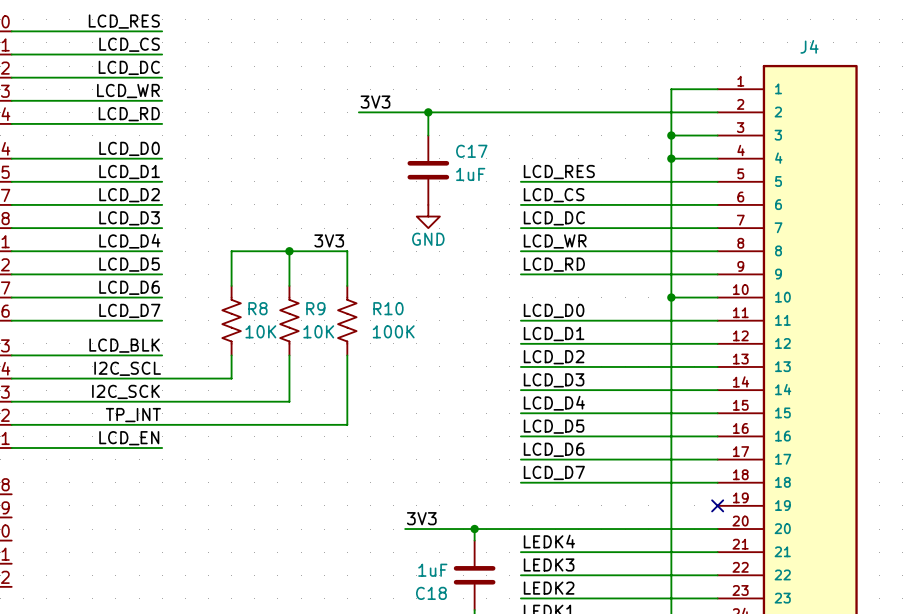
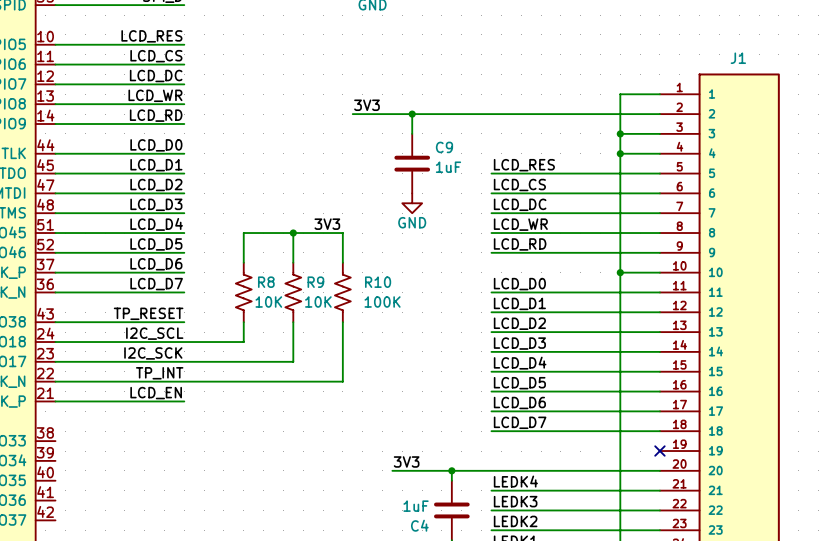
J4 name: J4 (809, 46) -> J1 (738, 58)
C17 name: C17 (471, 151) -> C9 (444, 147)
label: LCD_BLK (124, 345) -> TP_RESET (148, 313)
C18 name: C18 (431, 593) -> C4 (419, 525)

